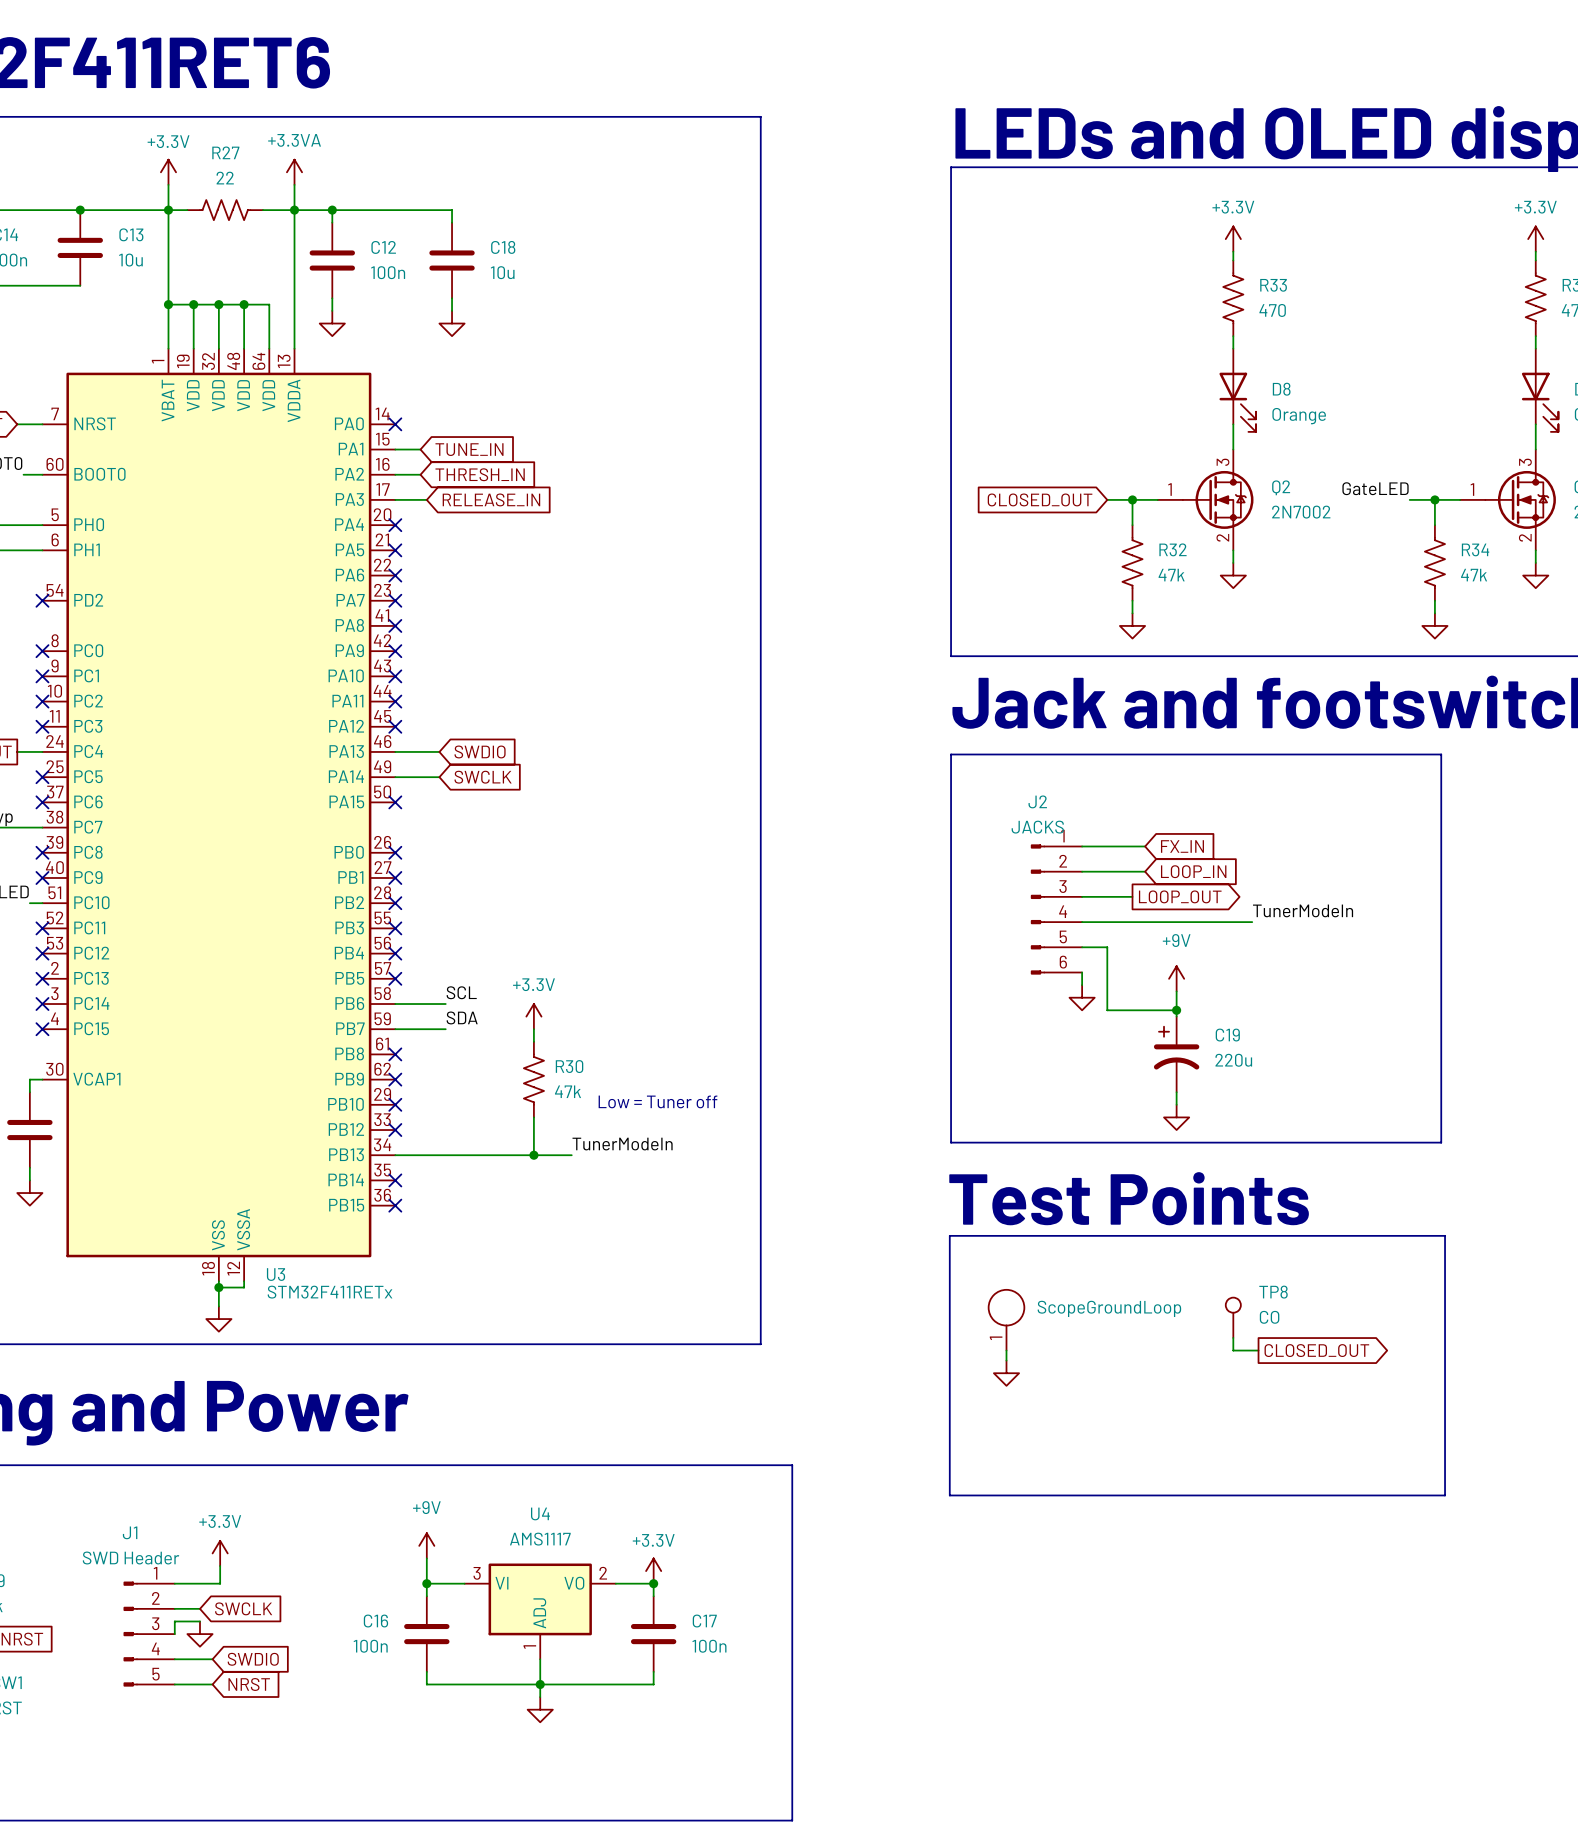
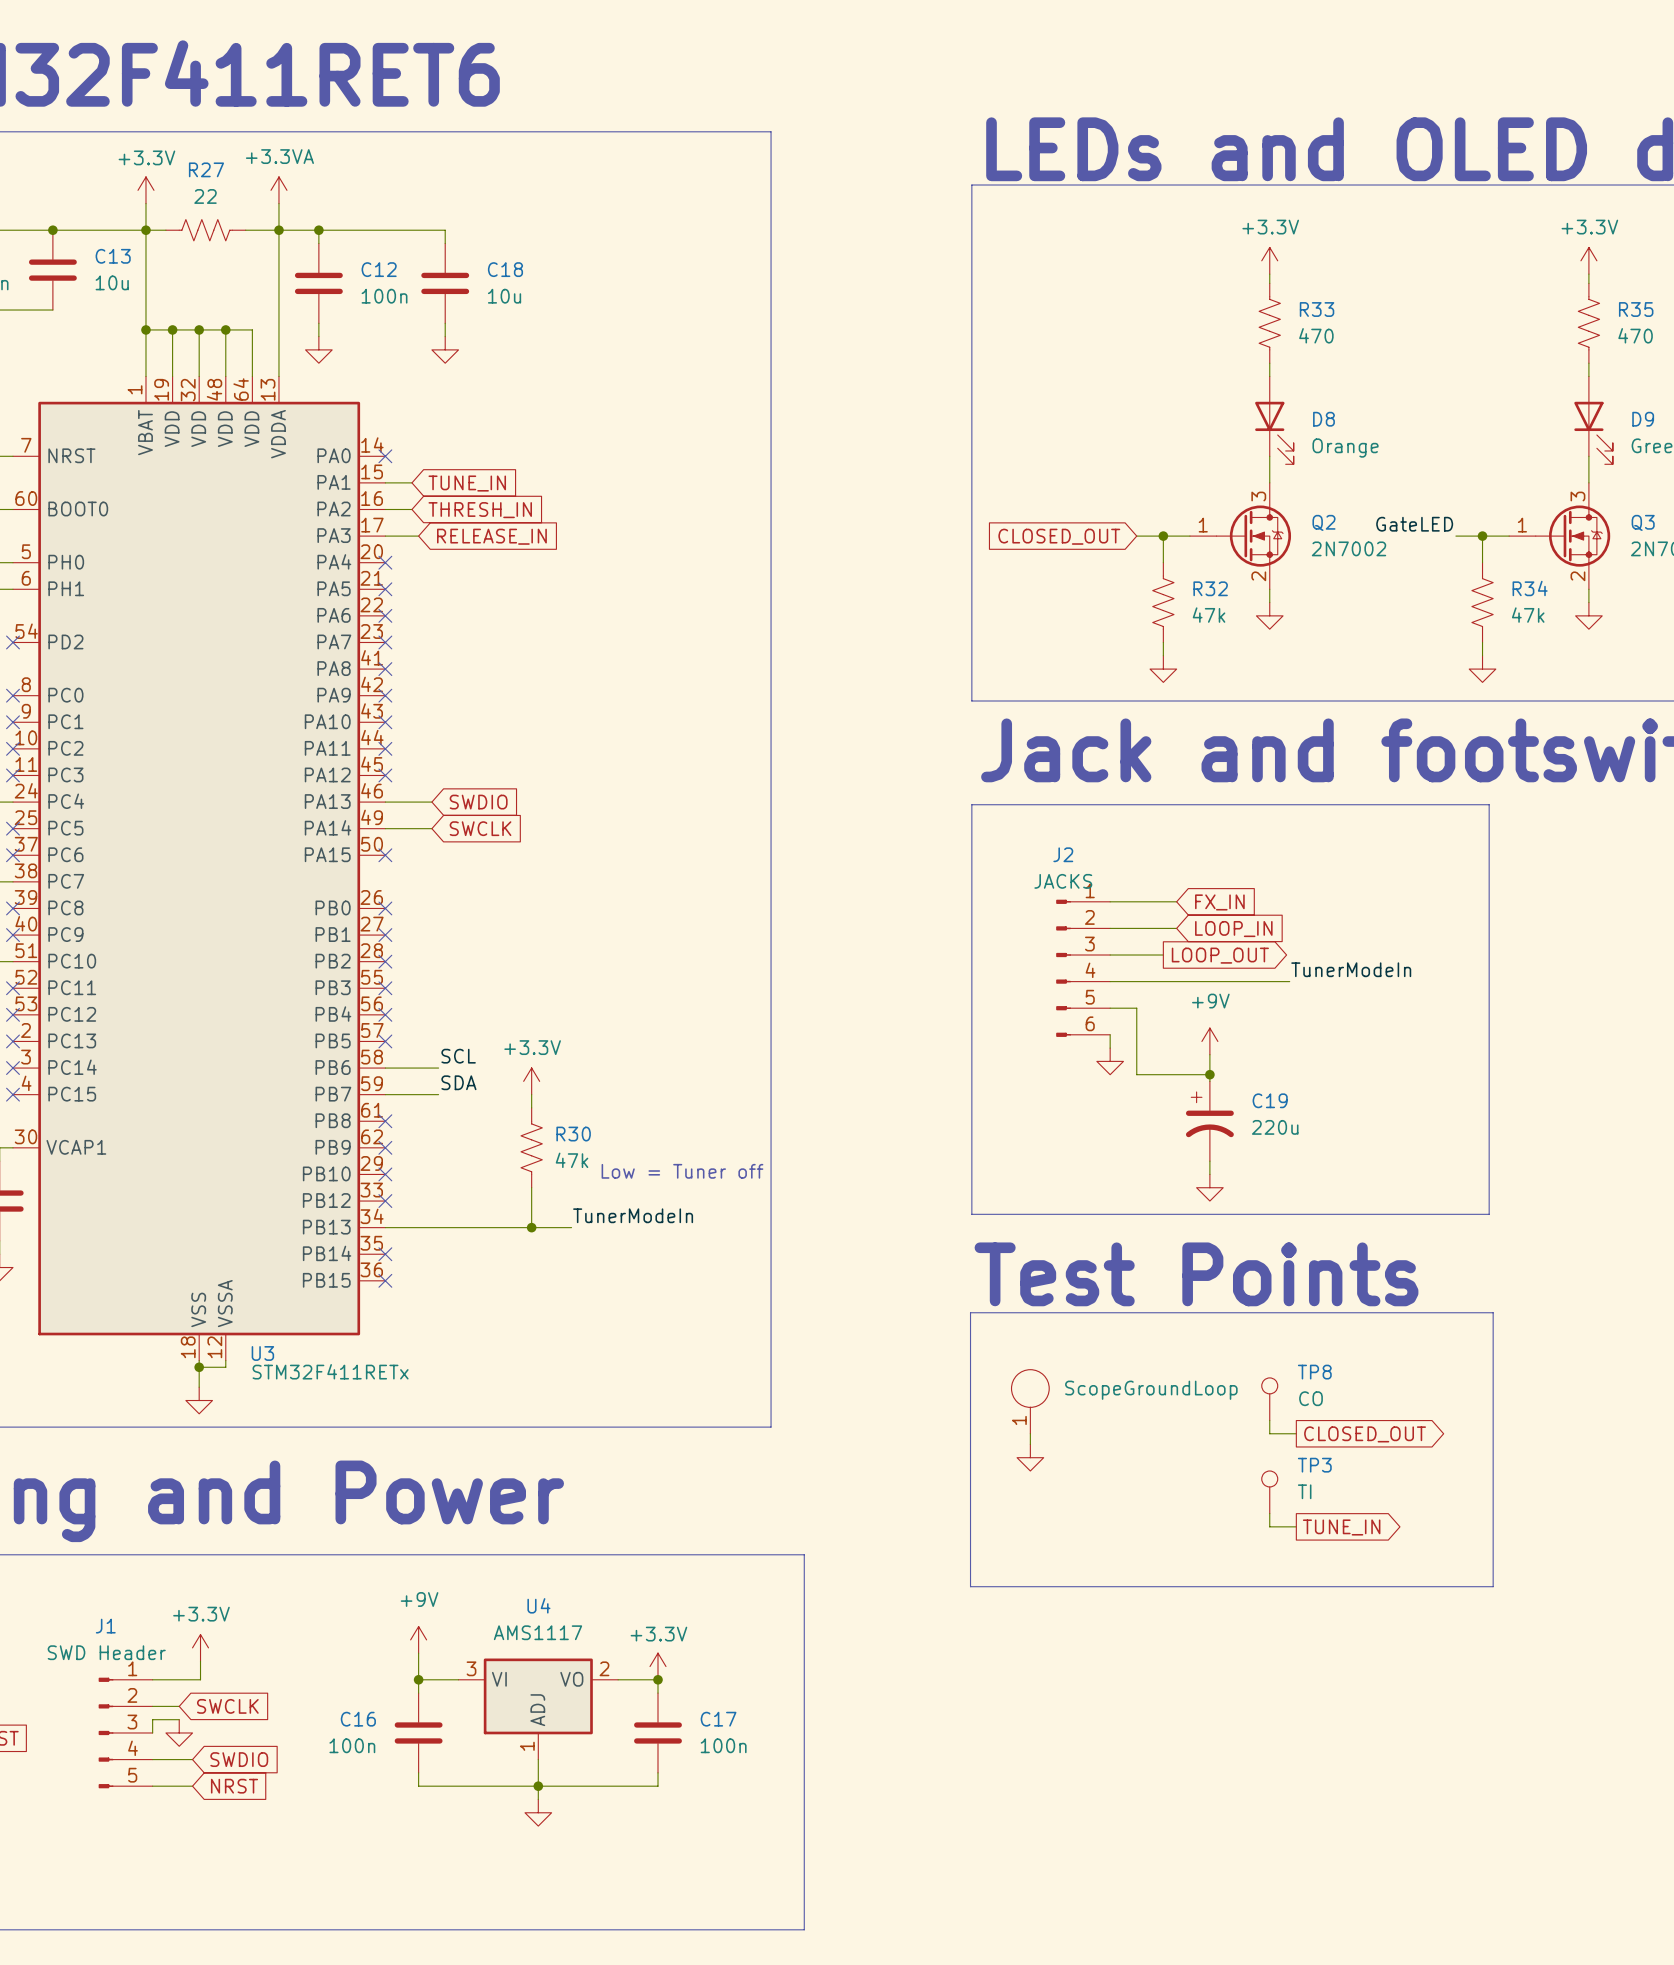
TP3: none -> TI (1269, 1492)
wire: none -> (1269, 1513) (1269, 1526) (1296, 1526)
global label: none -> TUNE_IN (1341, 1527)

